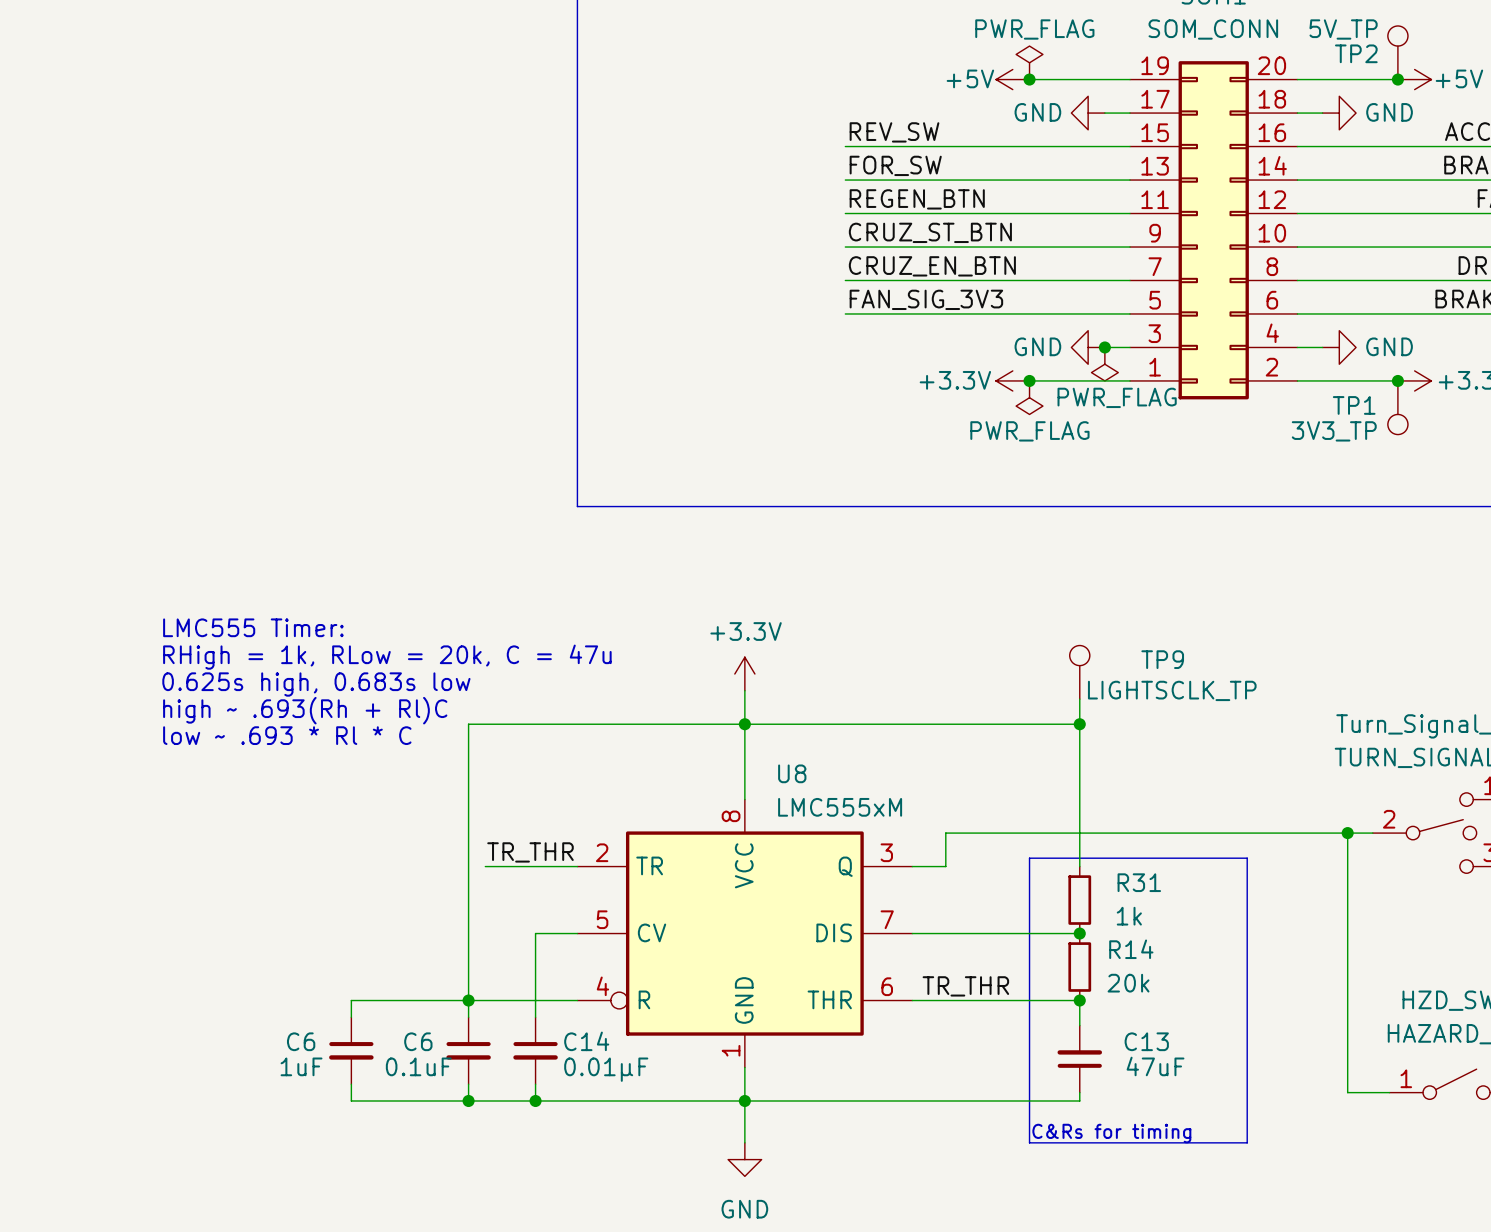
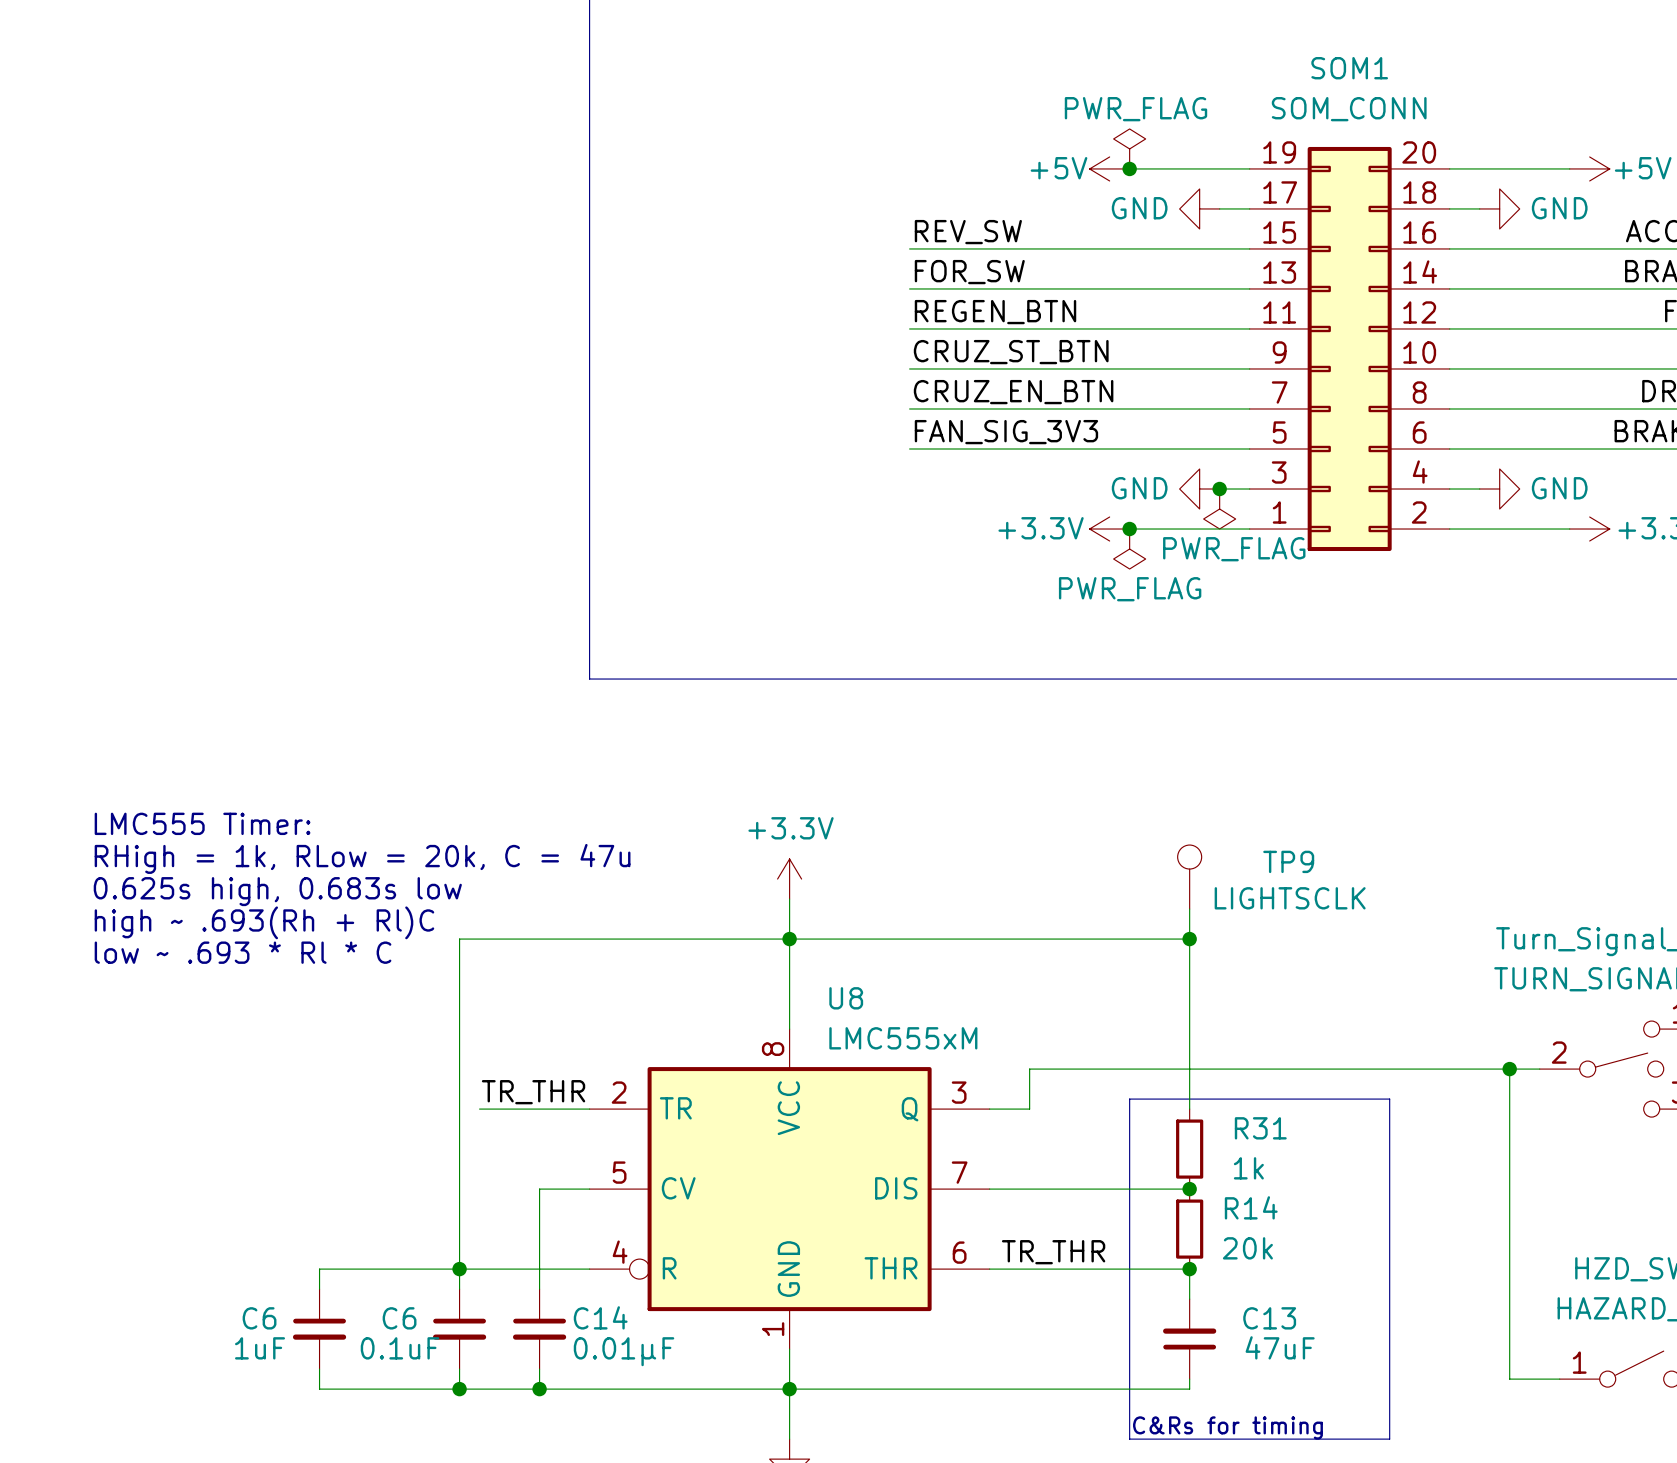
TP2: 5V_TP (1397, 52) -> none
junction: (1397, 79) -> none
junction: (1397, 380) -> none
TP1: 3V3_TP (1397, 407) -> none
TP9 value: LIGHTSCLK_TP (1172, 690) -> LIGHTSCLK (1290, 898)

